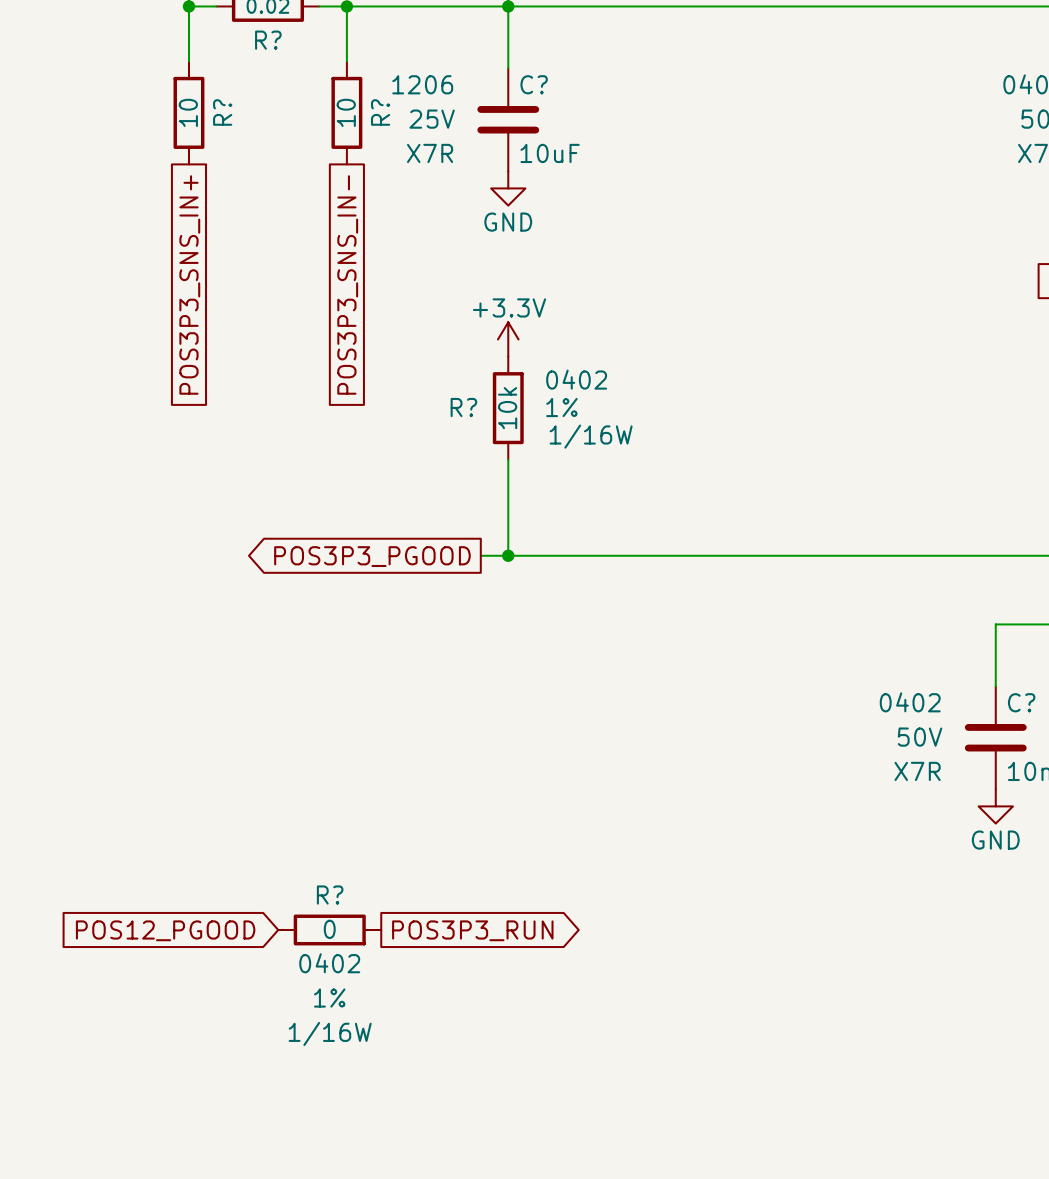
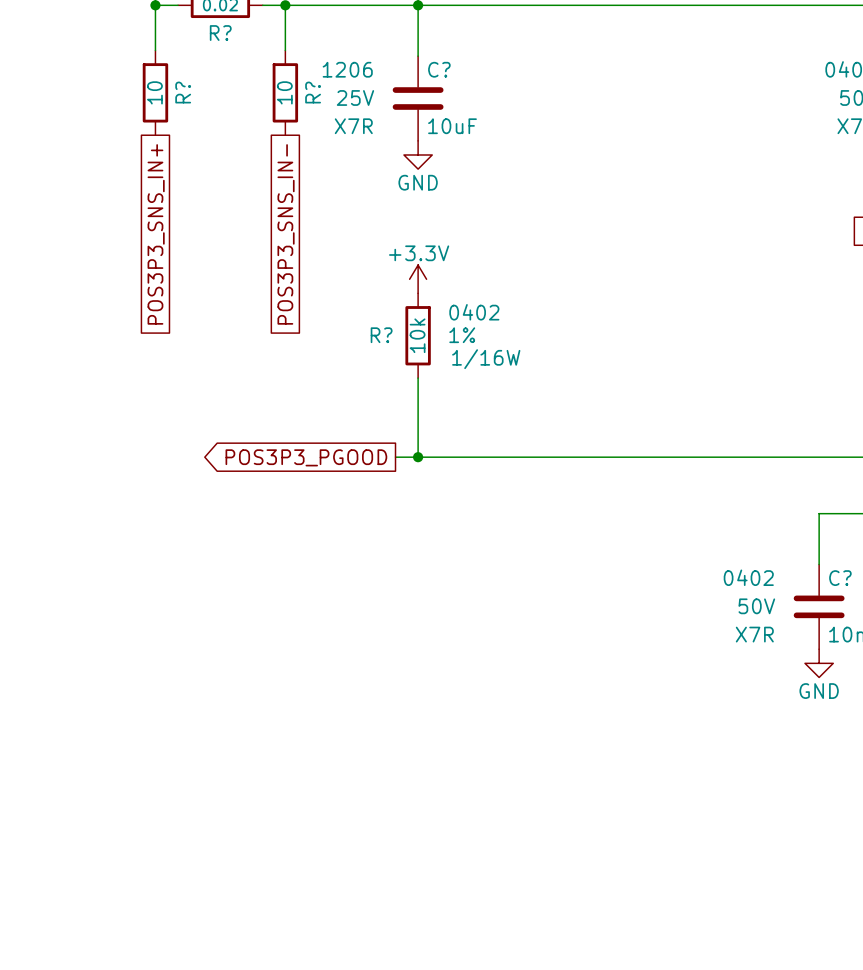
R?: 0 (329, 929) -> none
global label: POS12_PGOOD (165, 930) -> none
global label: POS3P3_RUN (472, 930) -> none

